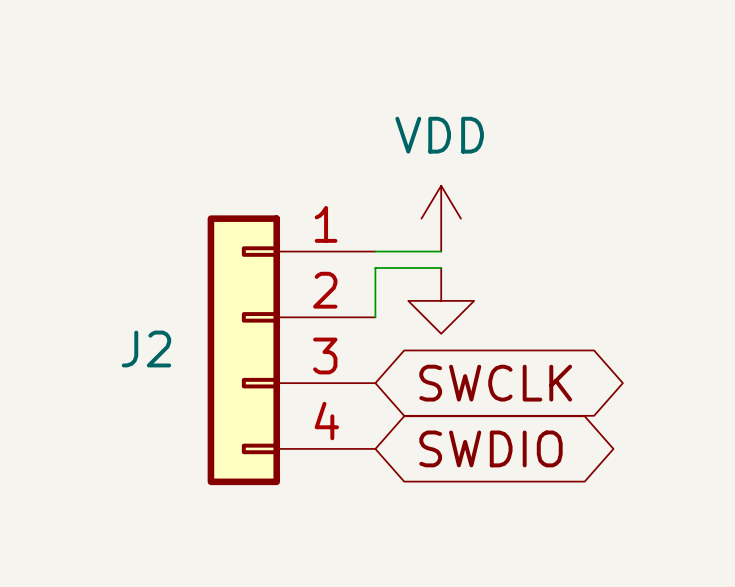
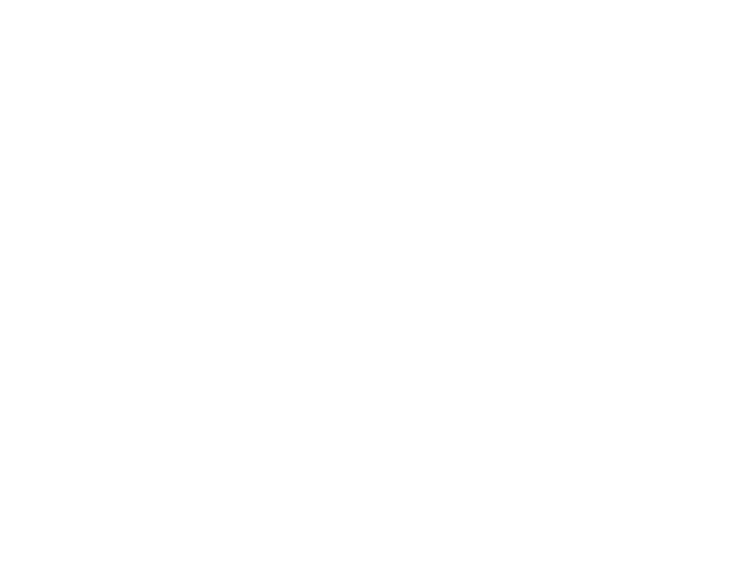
power symbol: VDD (441, 218) -> none
wire: (375, 251) (441, 251) -> none
wire: (441, 268) (375, 268) (375, 317) -> none
power symbol: (441, 300) -> none
J2: (291, 350) -> none
global label: SWCLK (495, 383) -> none
global label: SWDIO (490, 448) -> none

